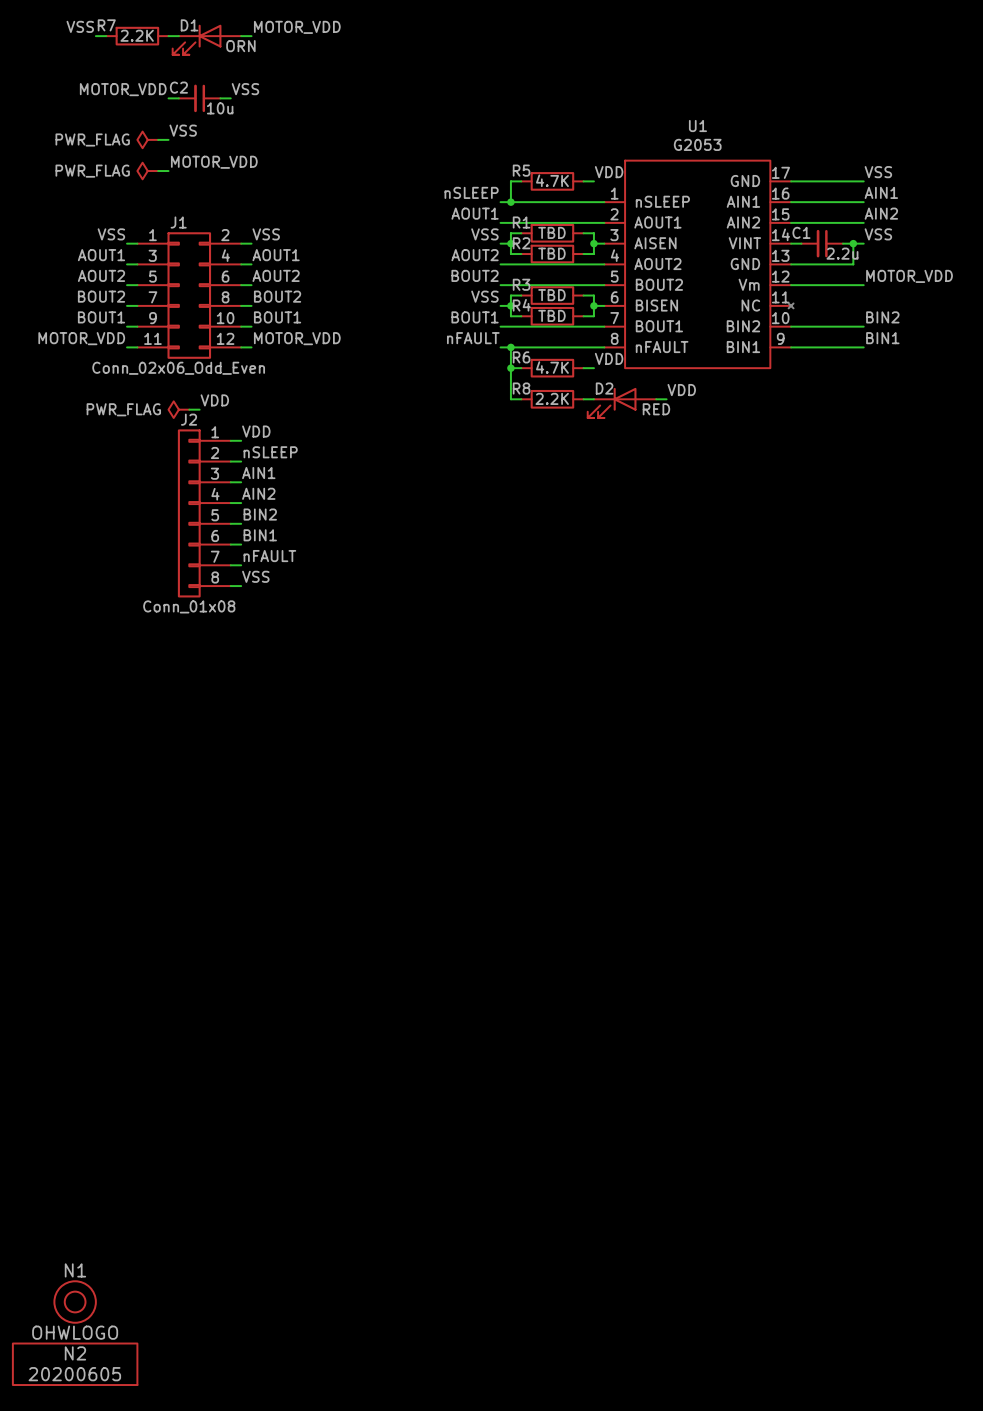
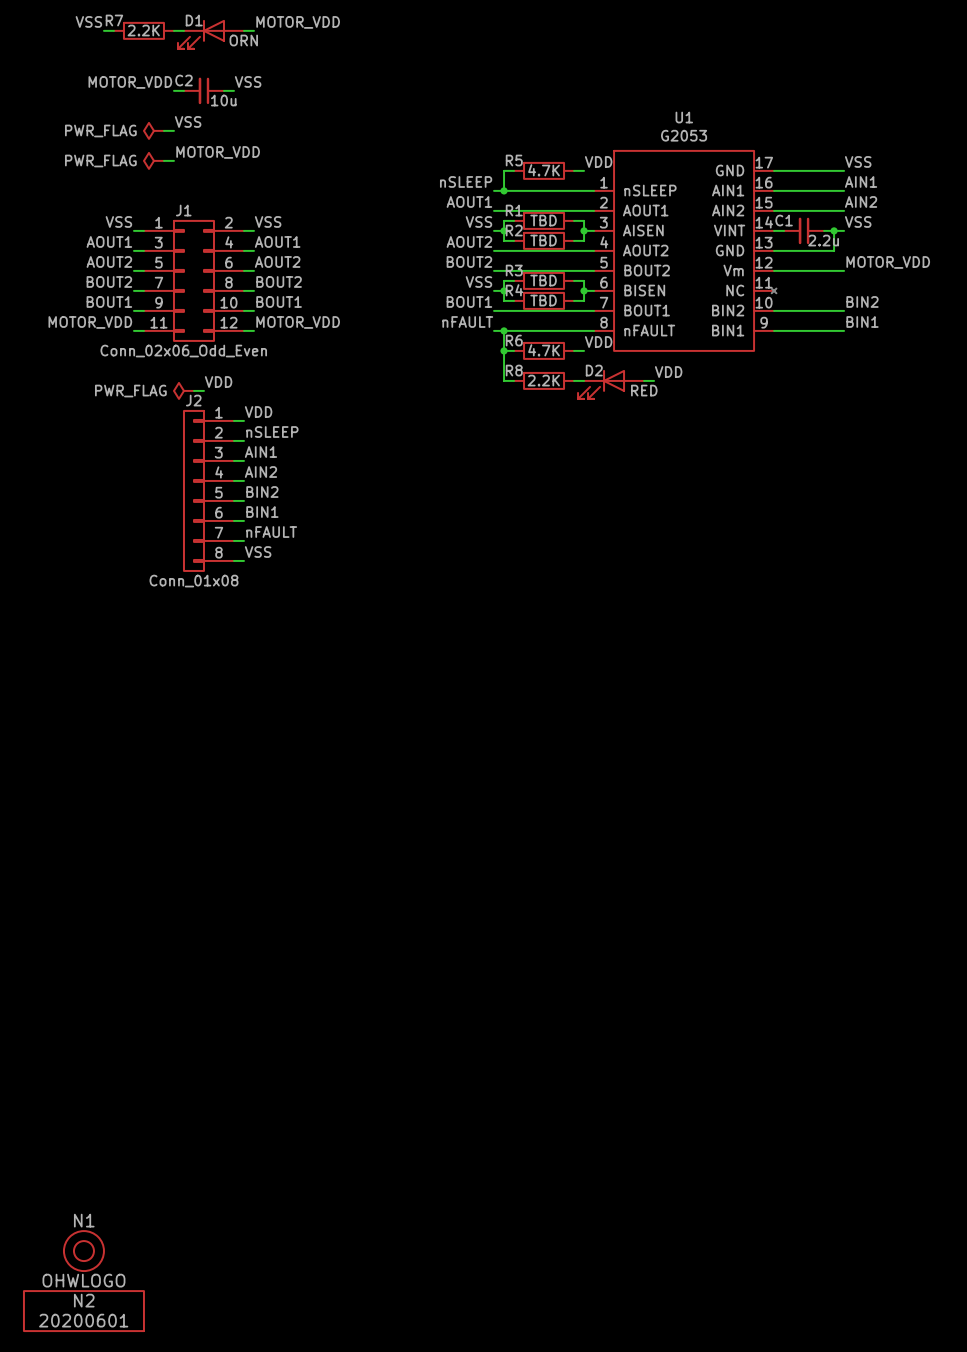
N2 value: 20200605 (74, 1374) -> 20200601 (83, 1320)

